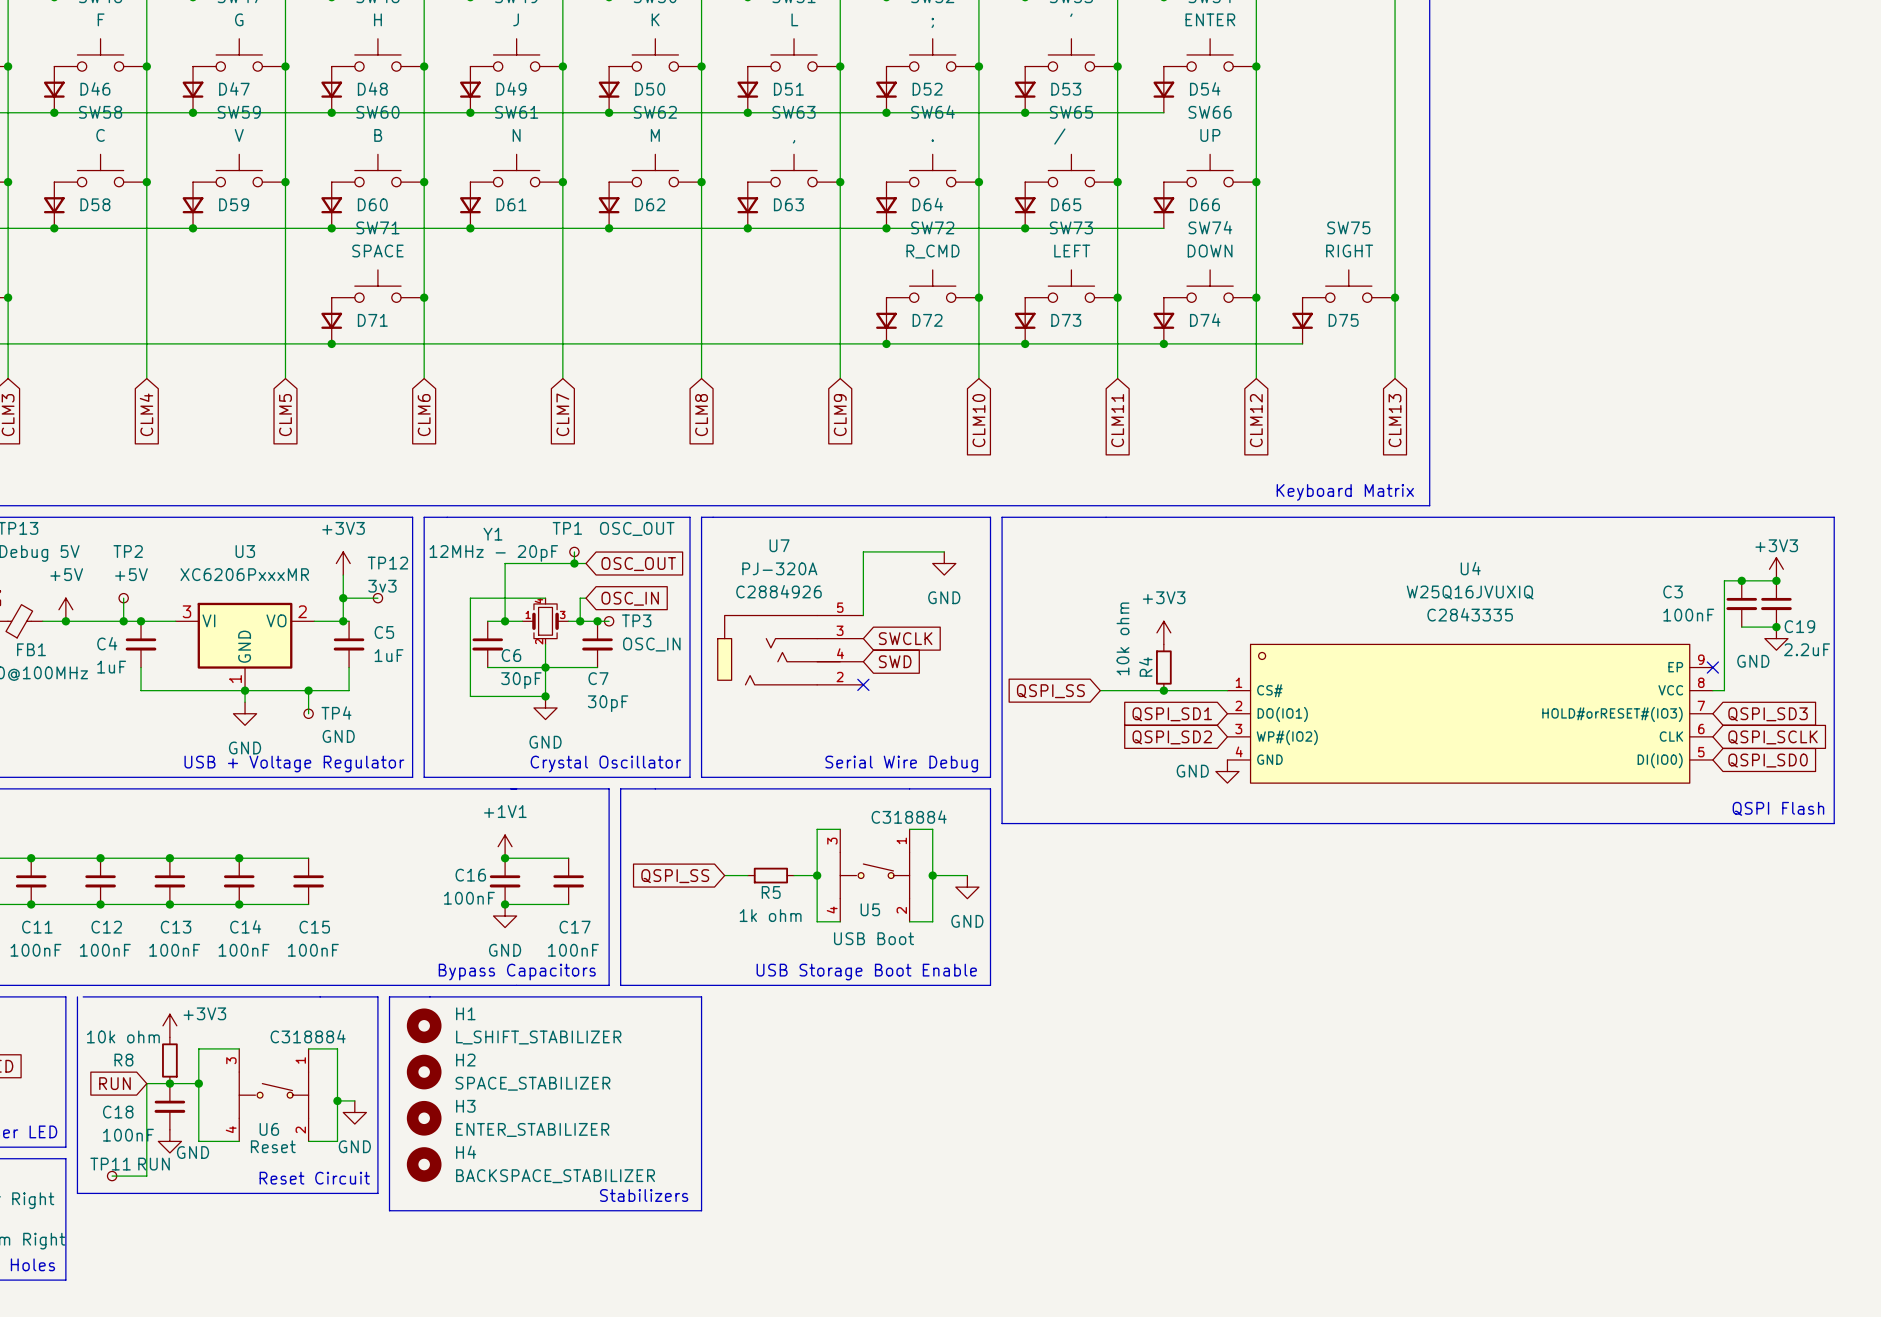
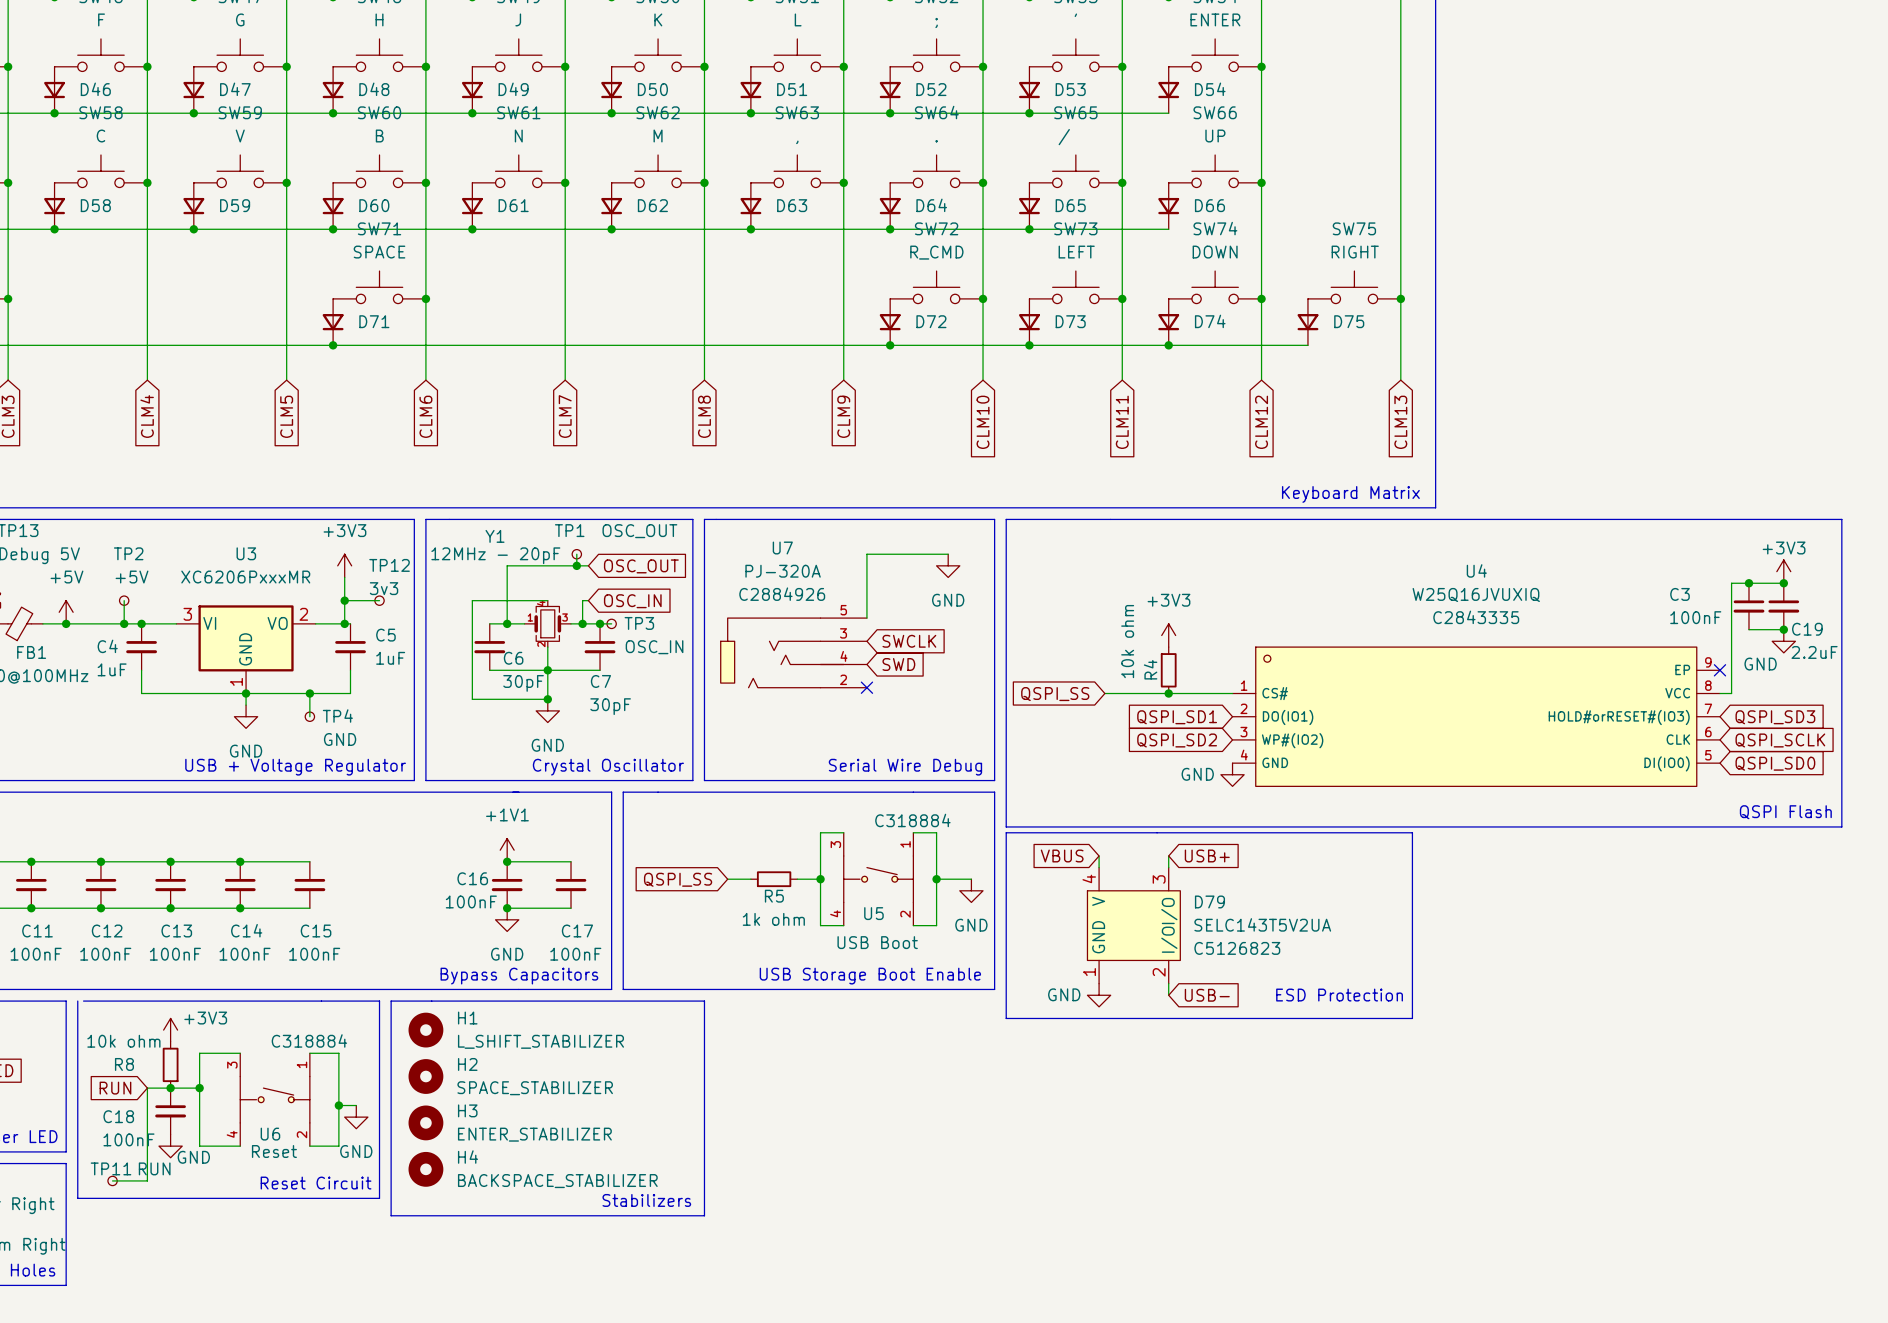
line: none -> (1006, 832) (1412, 832) (1412, 1018) (1006, 1018) (1006, 832)
global label: none -> VBUS (1062, 855)
wire: none -> (1099, 855) (1099, 867)
wire: none -> (1168, 855) (1168, 867)
global label: none -> USB+ (1207, 855)
D79: none -> SELC143T5V2UA (1133, 925)
wire: none -> (1168, 983) (1168, 995)
text: none -> ESD Protection (1339, 995)
power symbol: none -> GND (1099, 995)
global label: none -> USB- (1207, 995)

